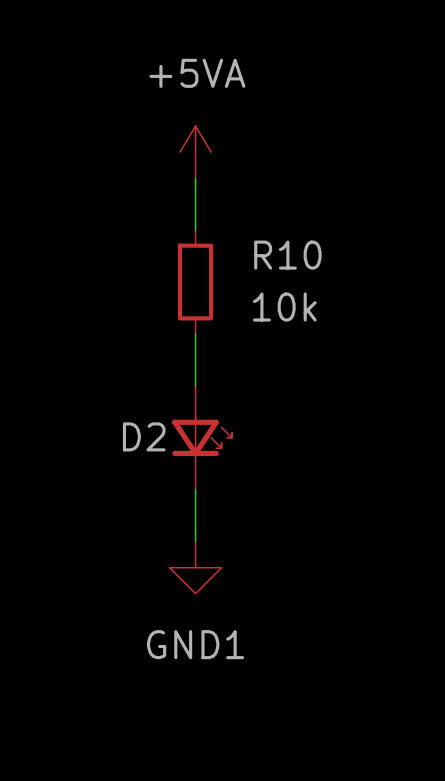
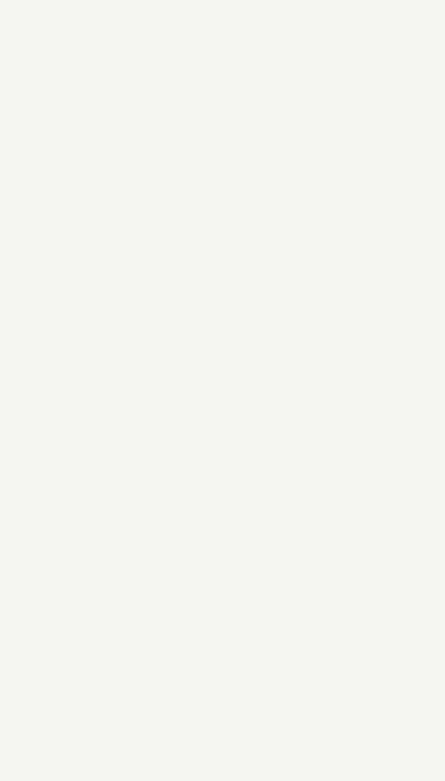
power symbol: +5VA (195, 152) -> none
wire: (195, 178) (195, 230) -> none
R10: 10k (195, 282) -> none
wire: (195, 333) (195, 385) -> none
D2: (202, 437) -> none
wire: (195, 489) (195, 541) -> none
power symbol: GND1 (195, 567) -> none

